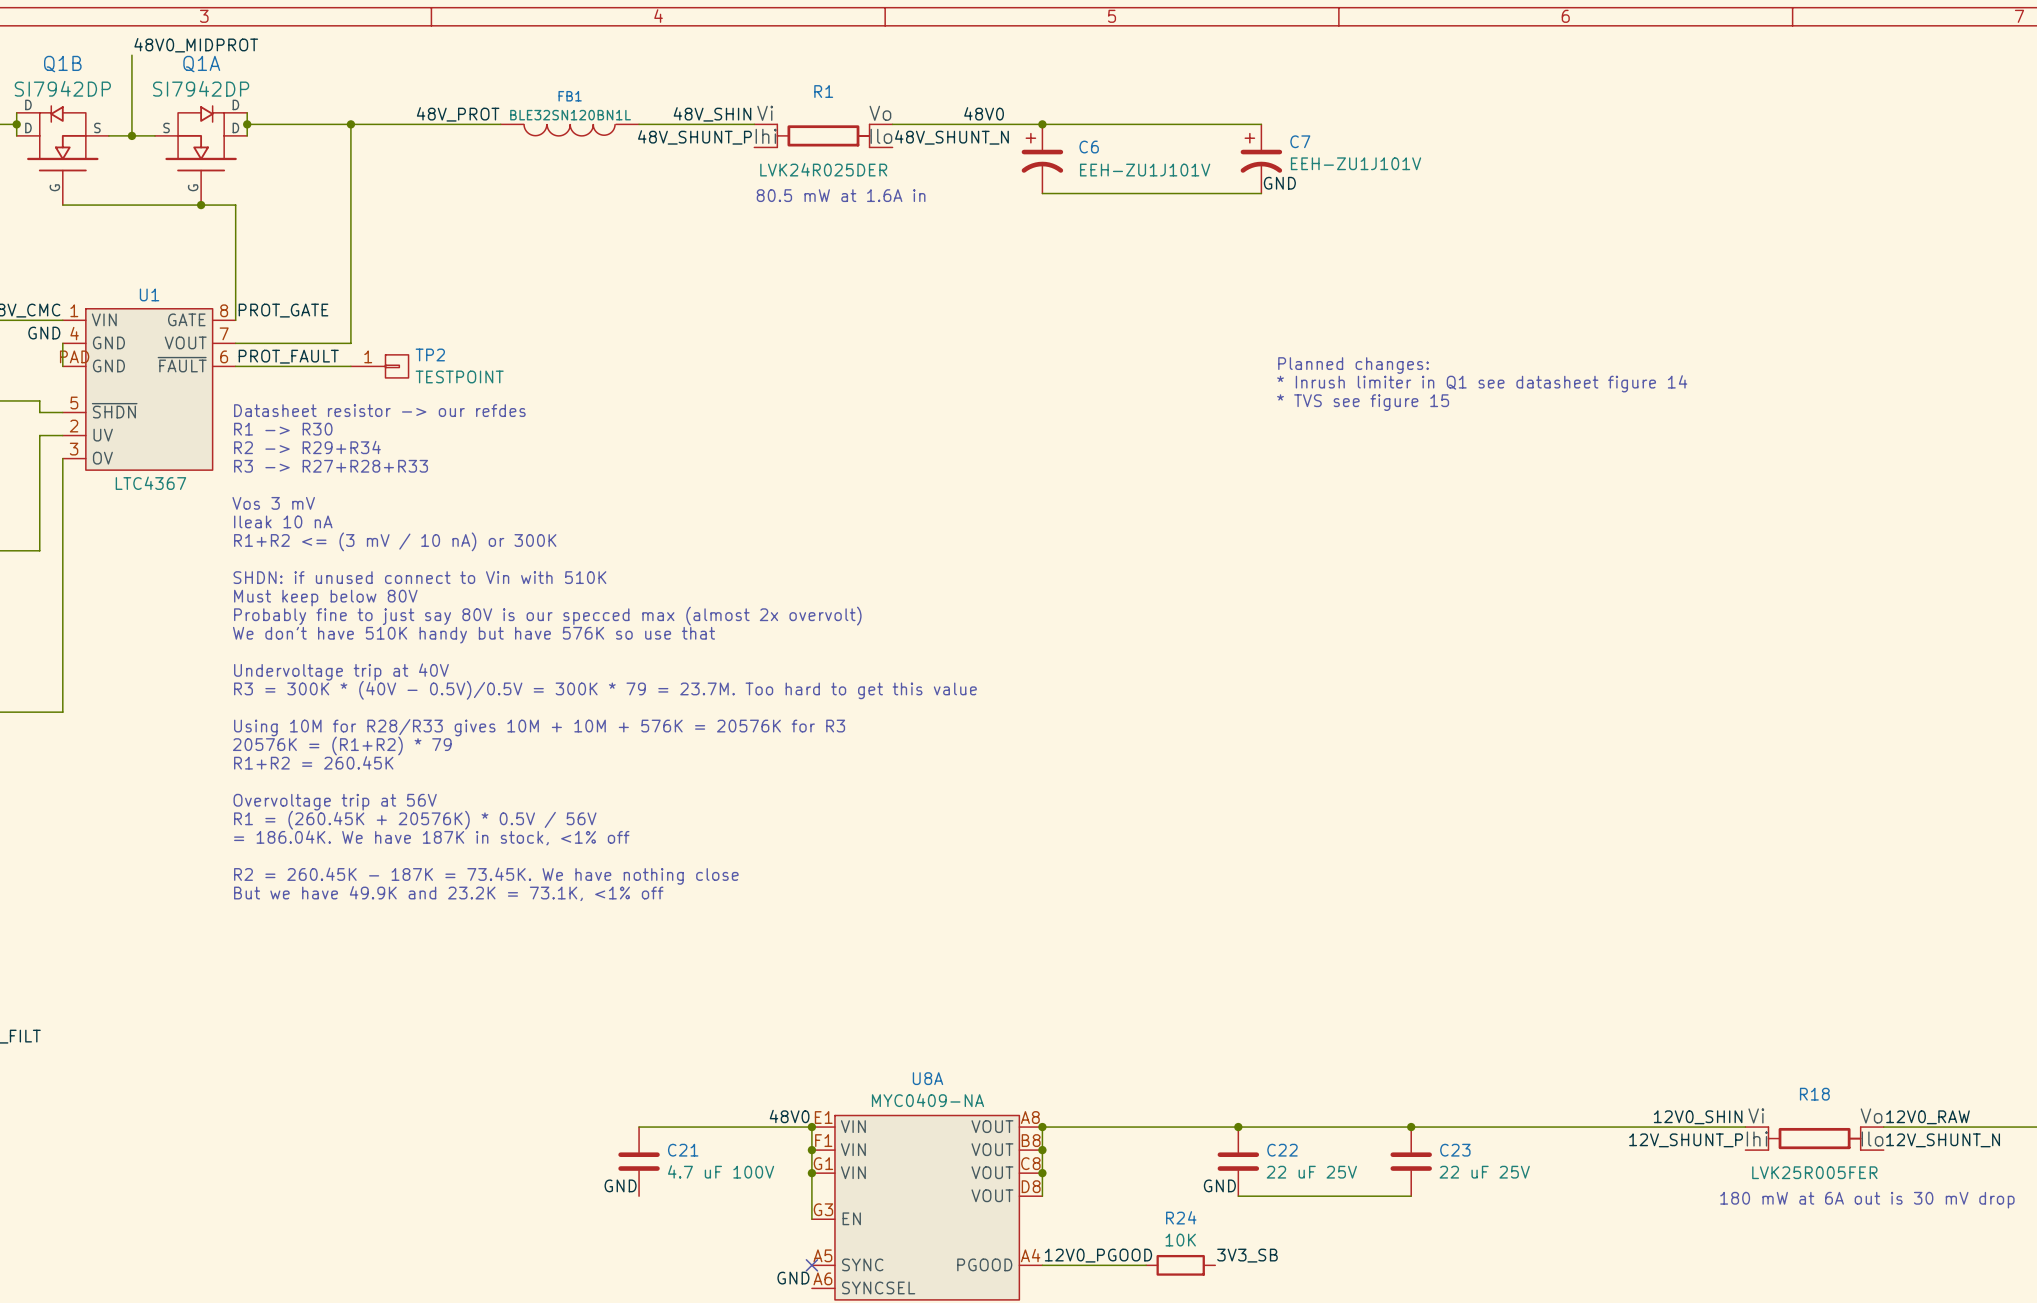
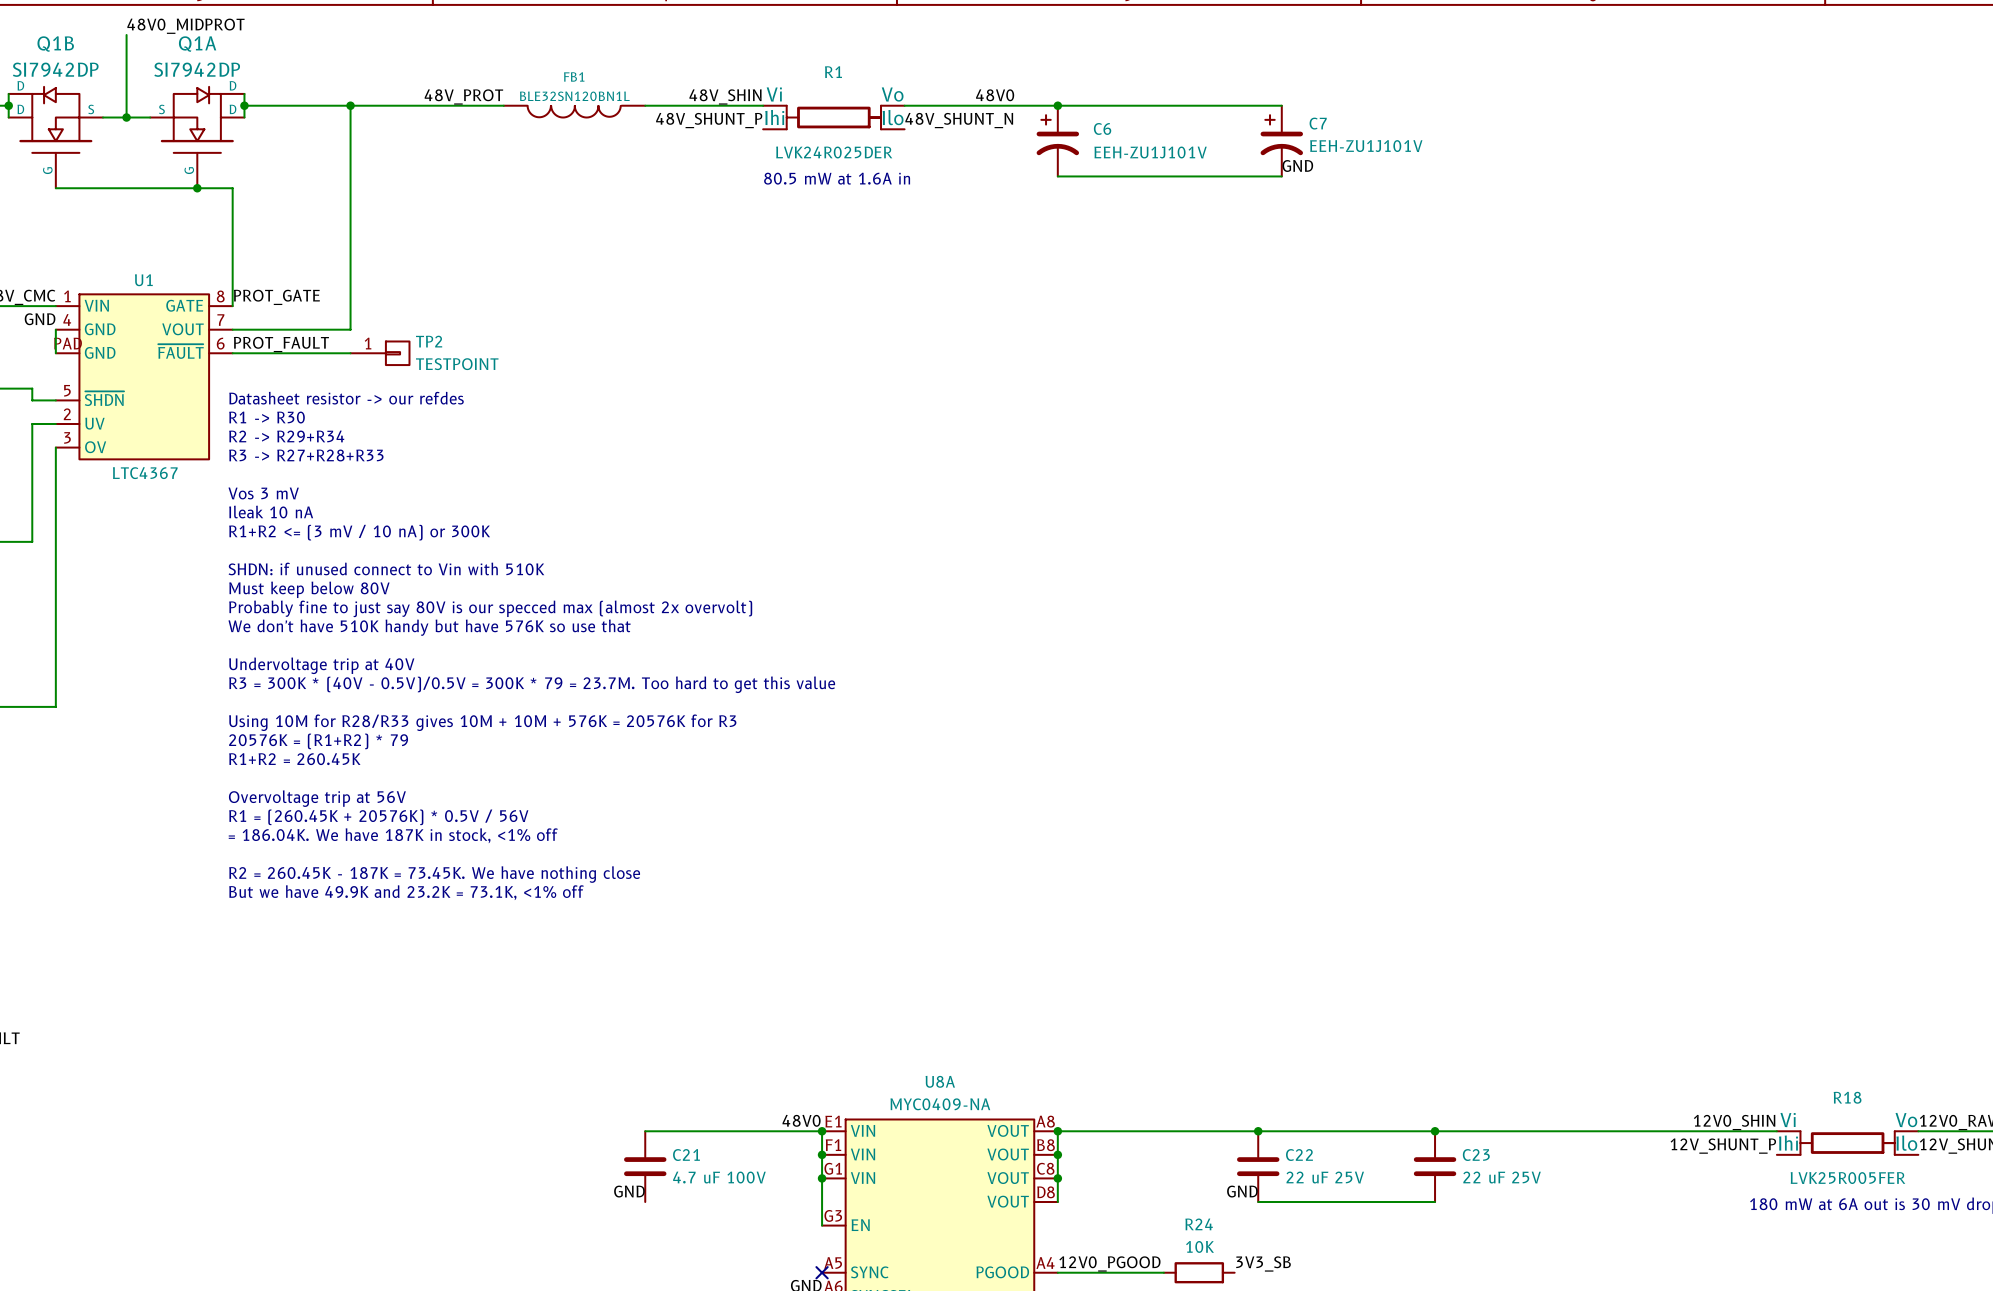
text: Planned changes: (1353, 365) -> none
text: * Inrush limiter in Q1 see datasheet figure 14 (1482, 383) -> none
text: * TVS see figure 15 (1363, 402) -> none

